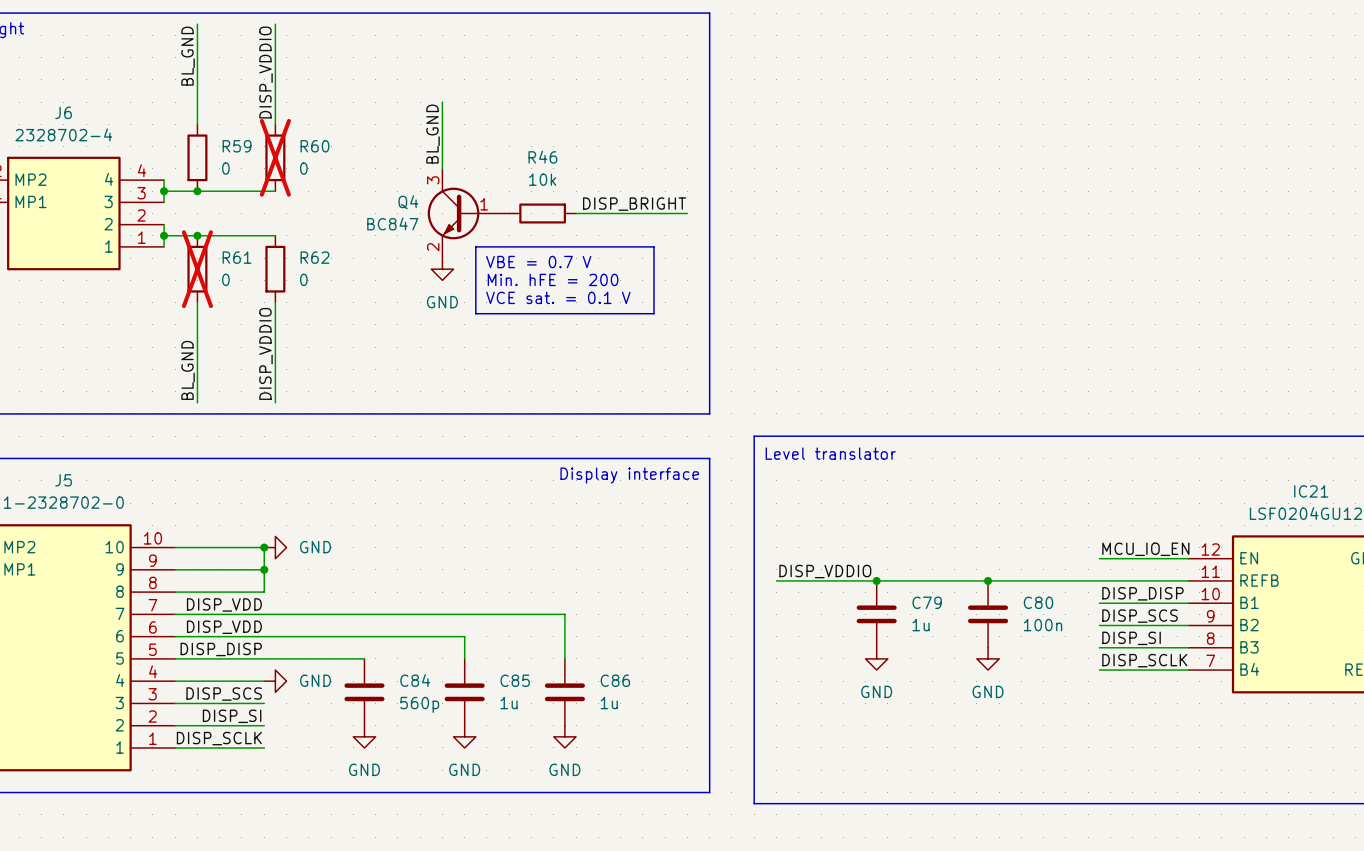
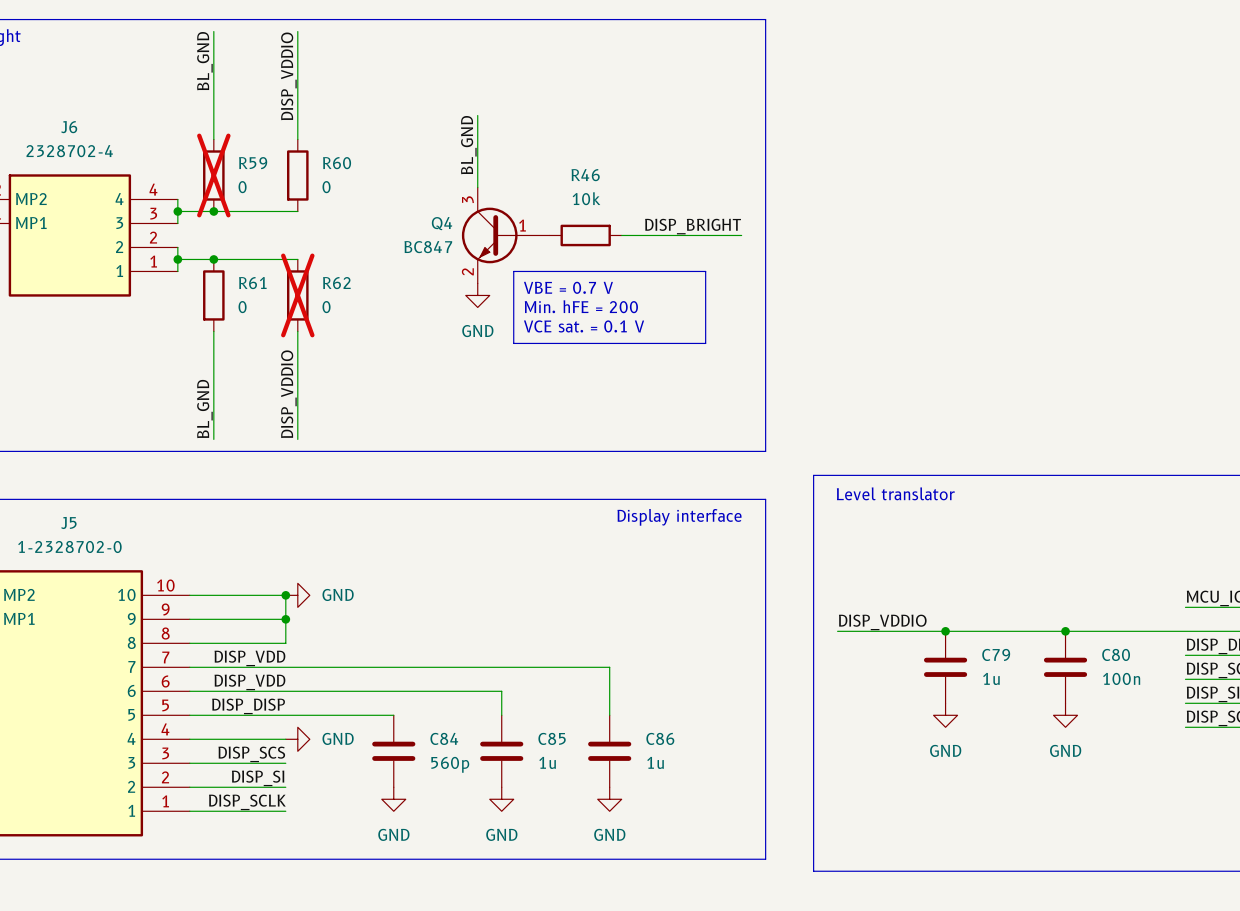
R59 do-not-place cross: none -> (213, 175)
R60 do-not-place cross: (275, 157) -> none
R61 do-not-place cross: (197, 269) -> none
R62 do-not-place cross: none -> (297, 295)

